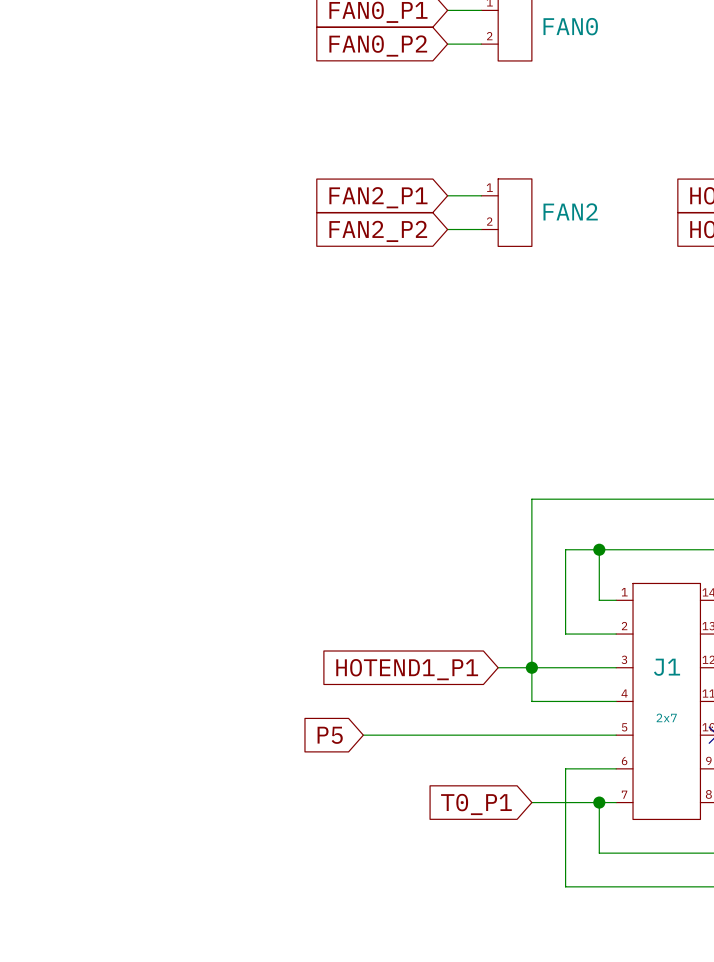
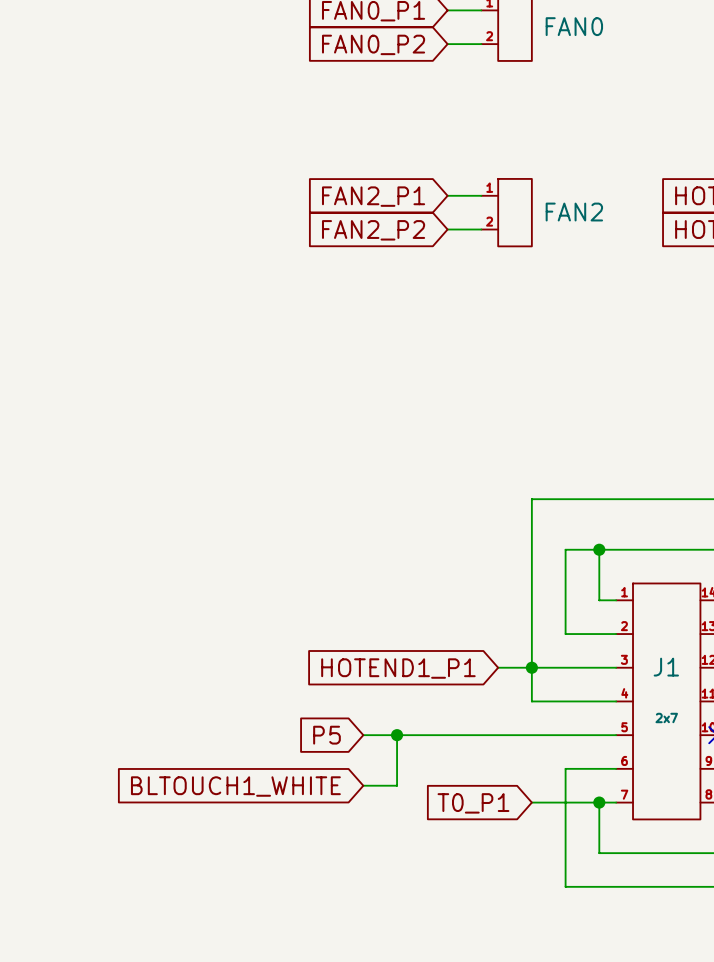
wire: none -> (397, 735) (397, 785) (363, 785)
junction: none -> (397, 735)
global label: none -> BLTOUCH1_WHITE (235, 786)

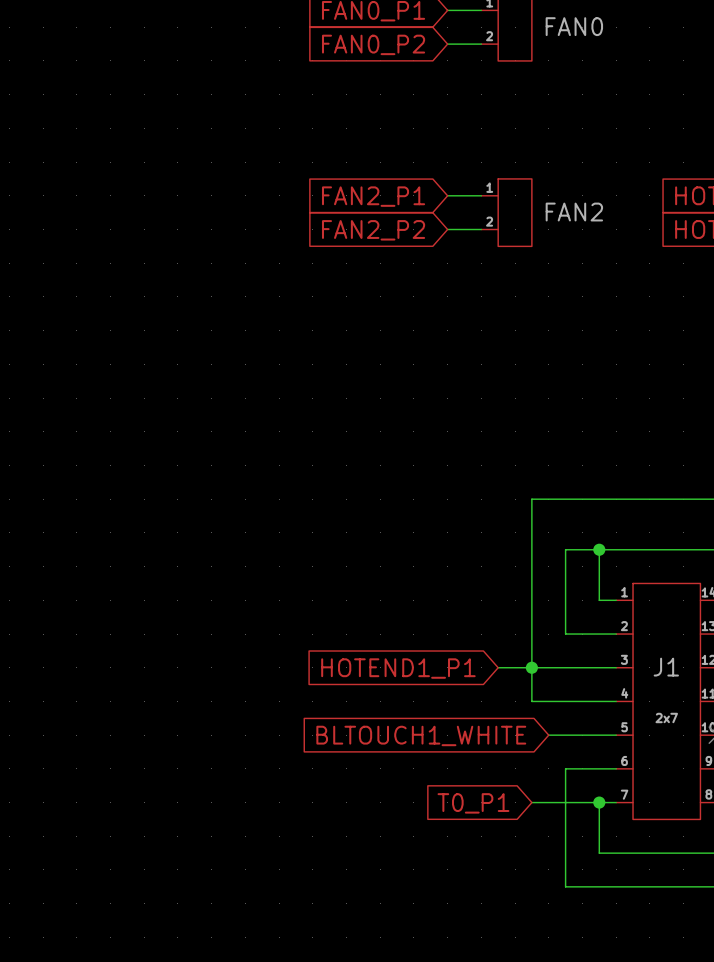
global label: P5 (326, 735) -> none
wire: (363, 735) (548, 735) -> none
wire: (397, 735) (397, 785) (363, 785) -> none
junction: (397, 735) -> none
global label position: BLTOUCH1_WHITE (235, 786) -> BLTOUCH1_WHITE (421, 735)

